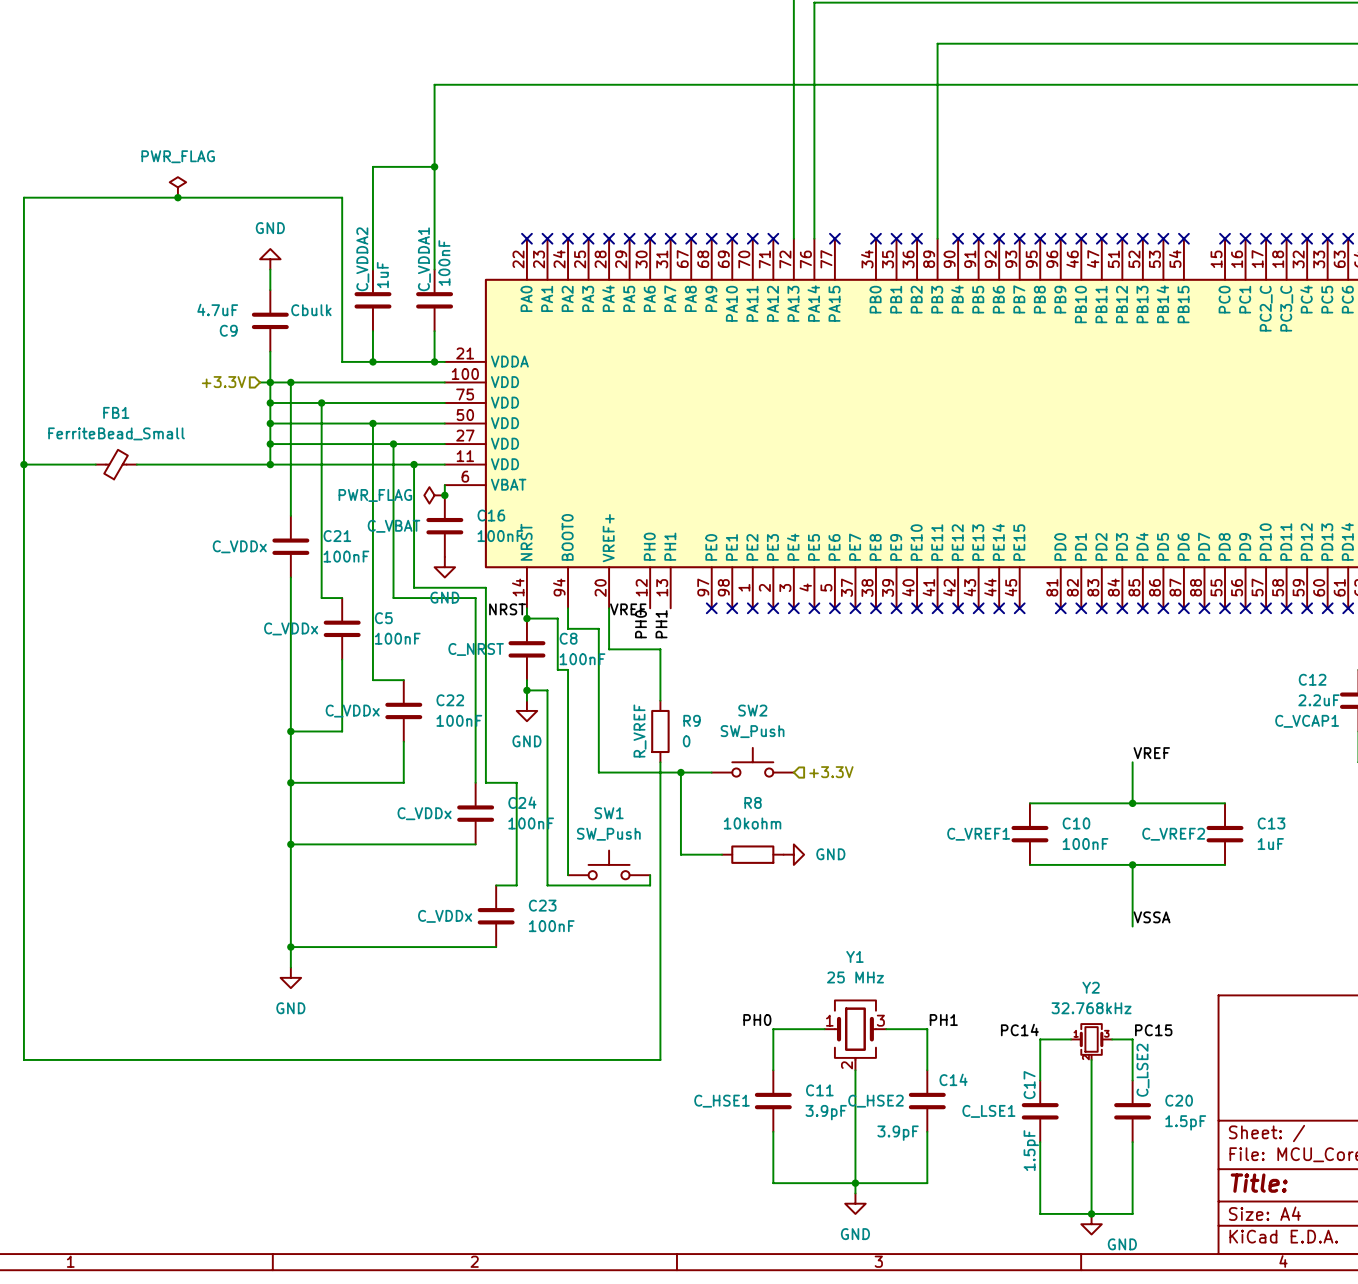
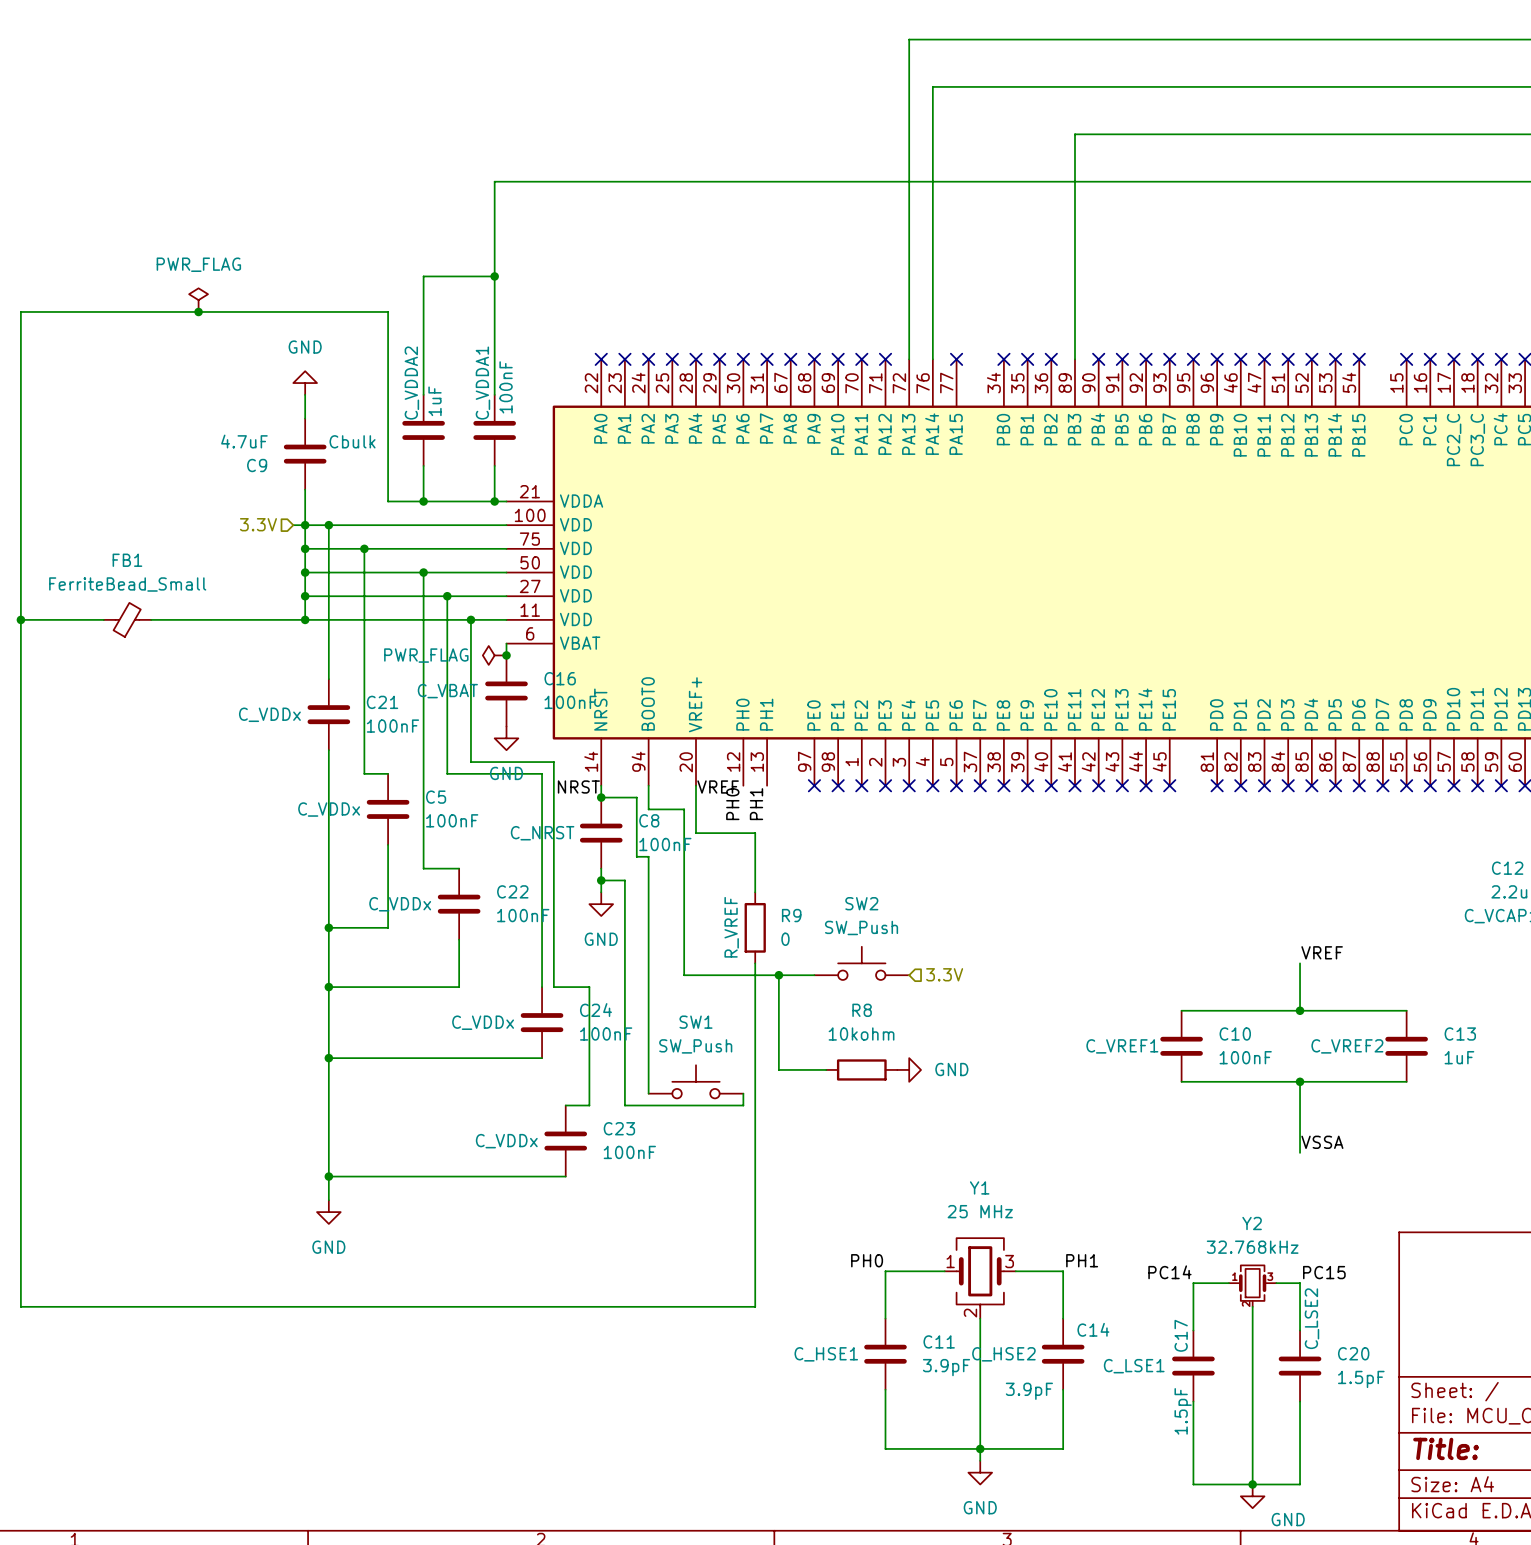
hierarchical label: +3.3V (223, 382) -> 3.3V (258, 524)
hierarchical label: +3.3V (831, 772) -> 3.3V (944, 974)

